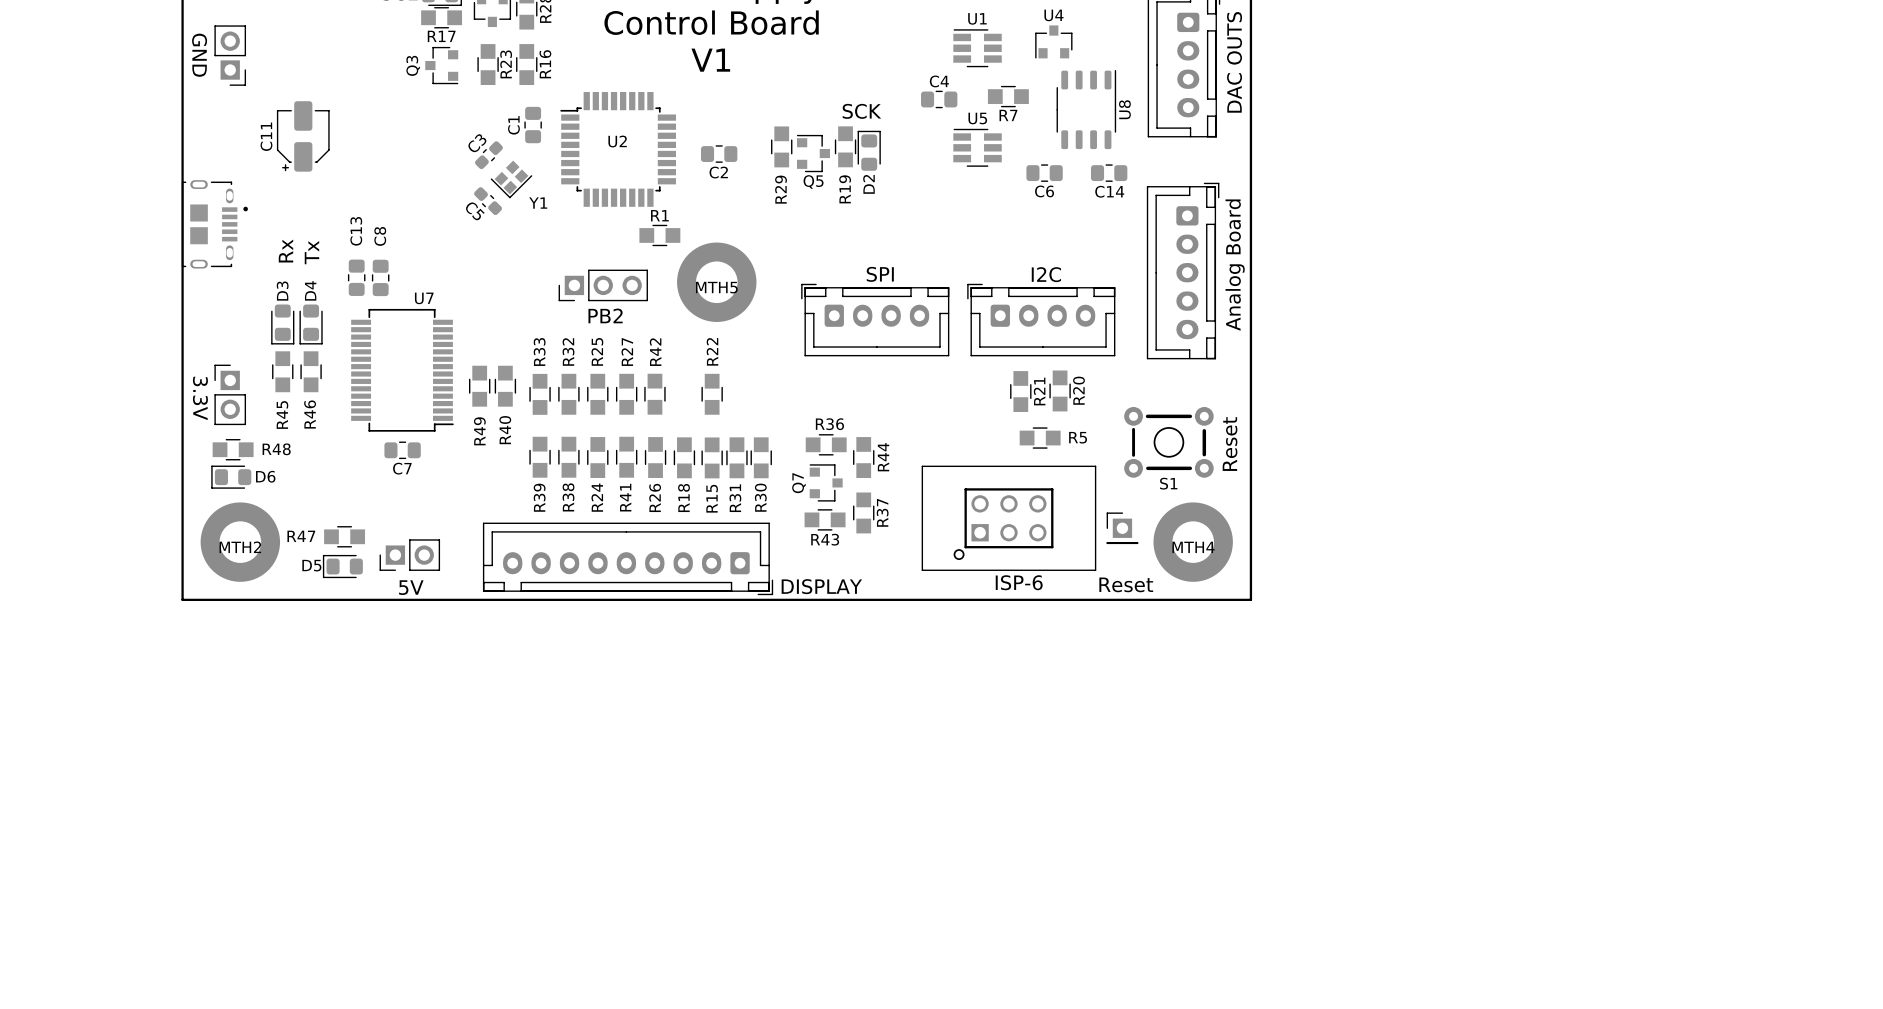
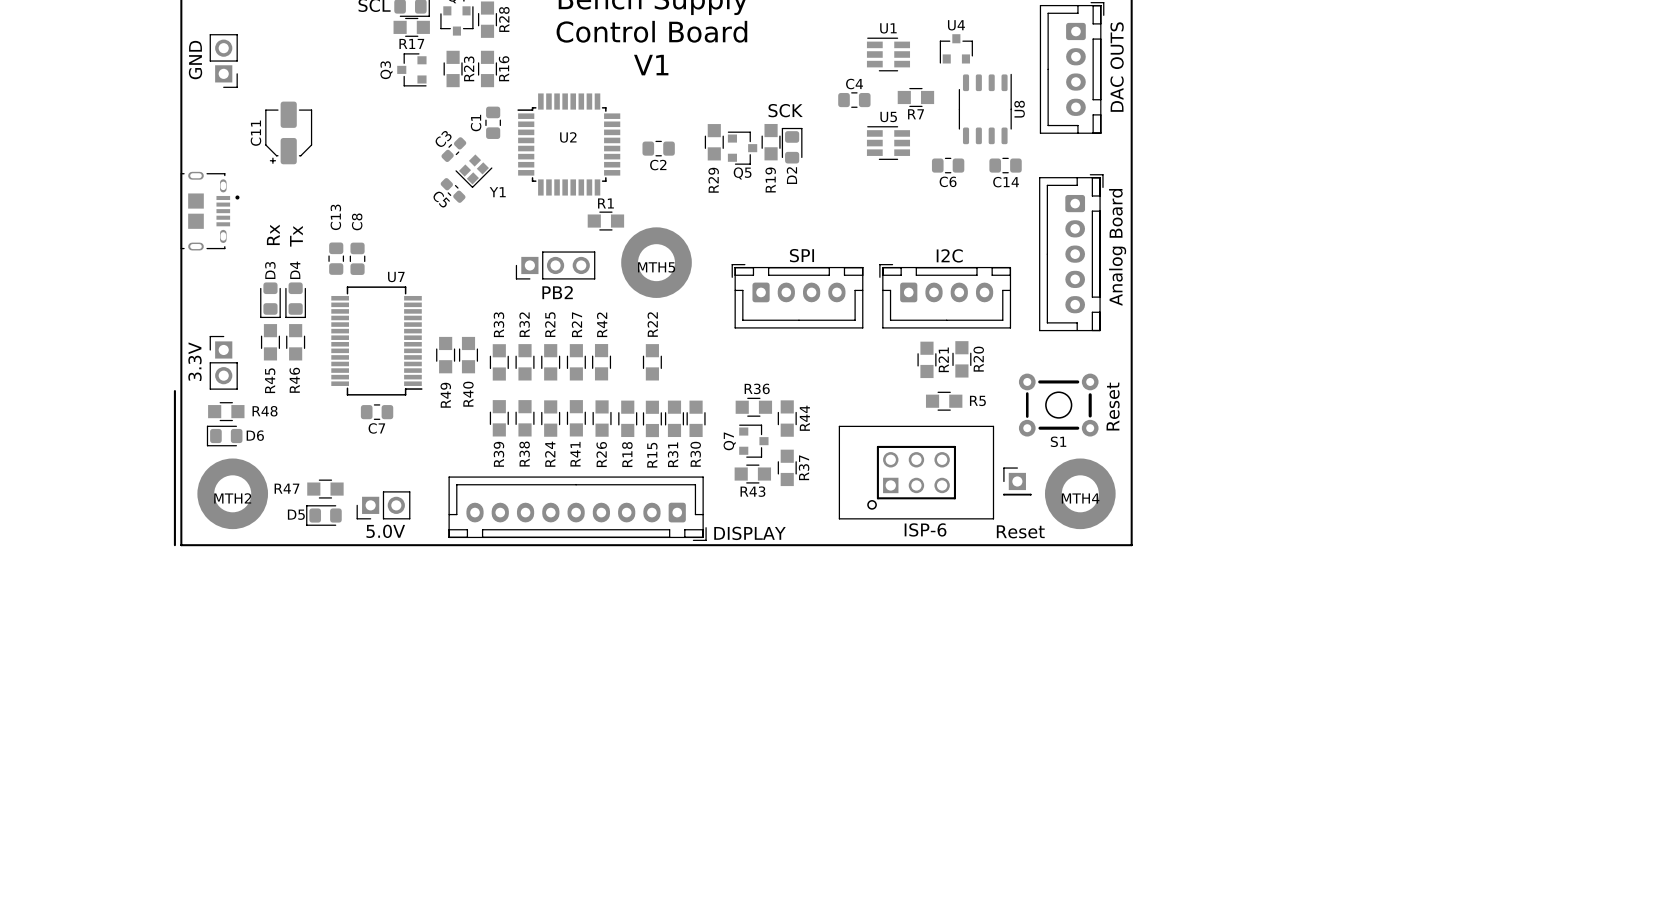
text rotation: 0° (199, 55) -> 180° (195, 60)
text rotation: 0° (200, 398) -> 180° (195, 361)
line: none -> (174, 391) (174, 545)
text: 5V (411, 587) -> 5.0V (385, 531)

